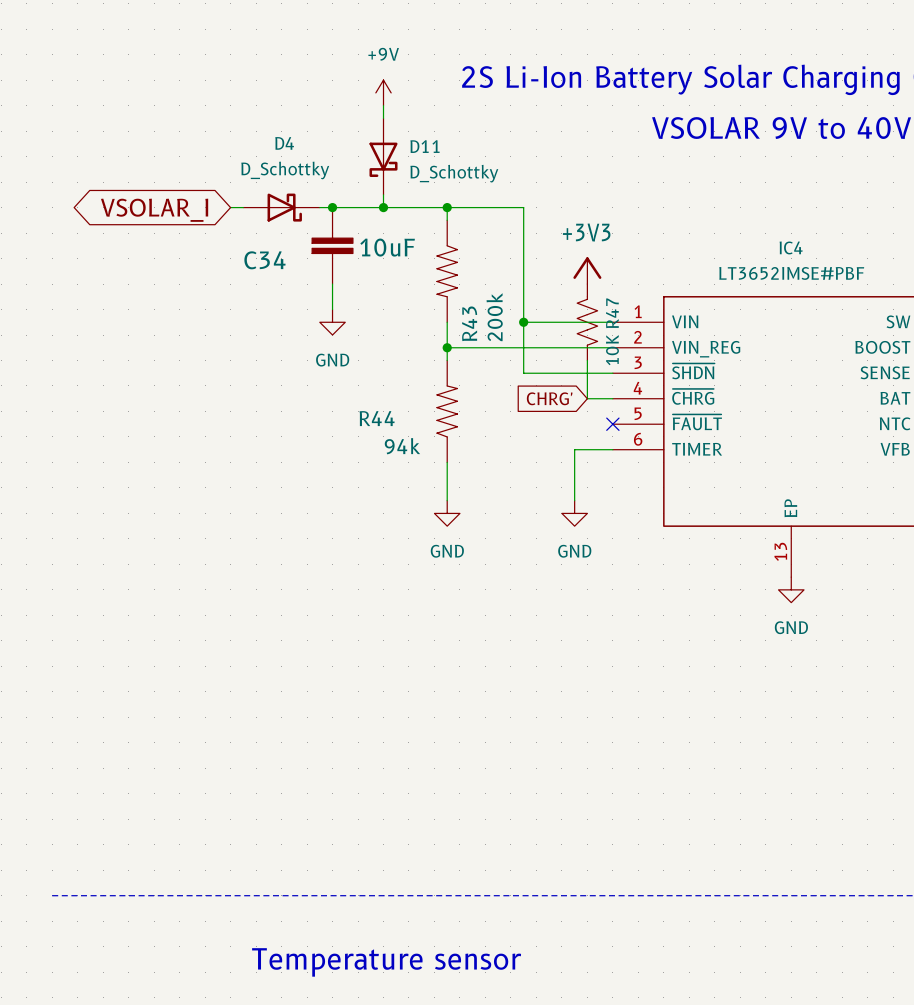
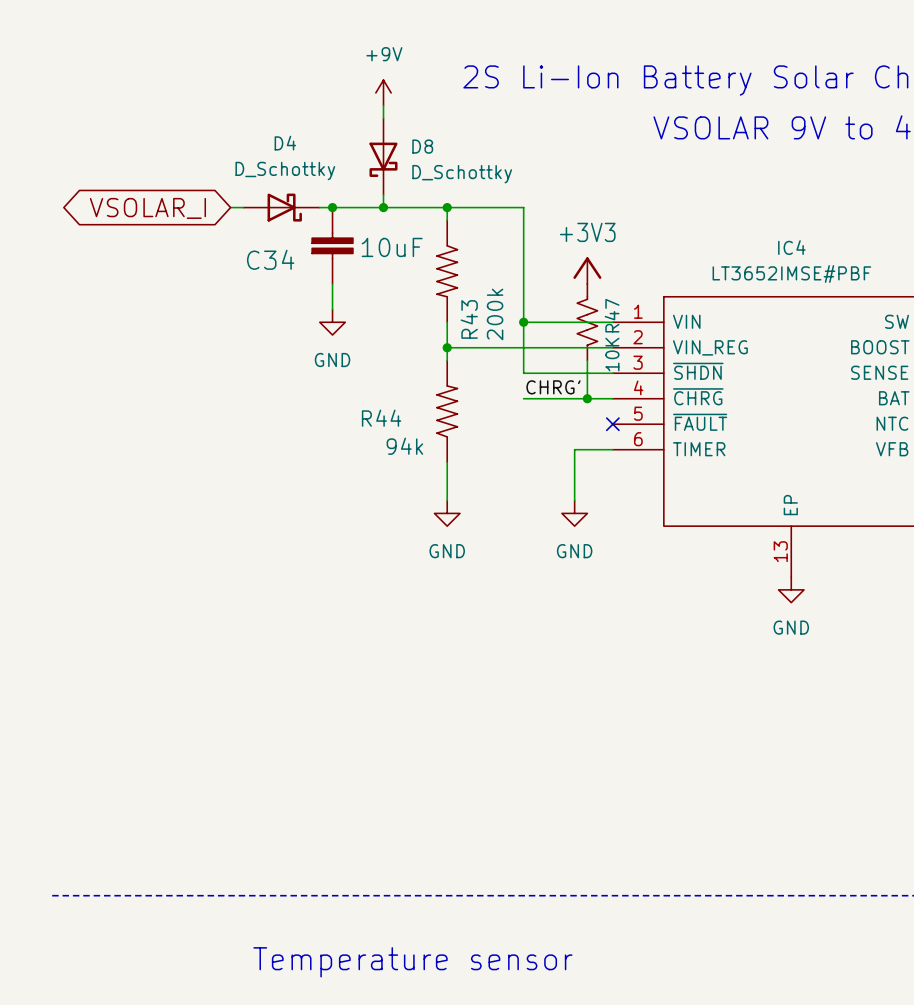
D11 name: D11 (425, 146) -> D8 (422, 146)
label: none -> CHRG' (553, 387)
wire: none -> (523, 398) (587, 398)
global label: CHRG' (549, 398) -> none
junction: none -> (587, 398)

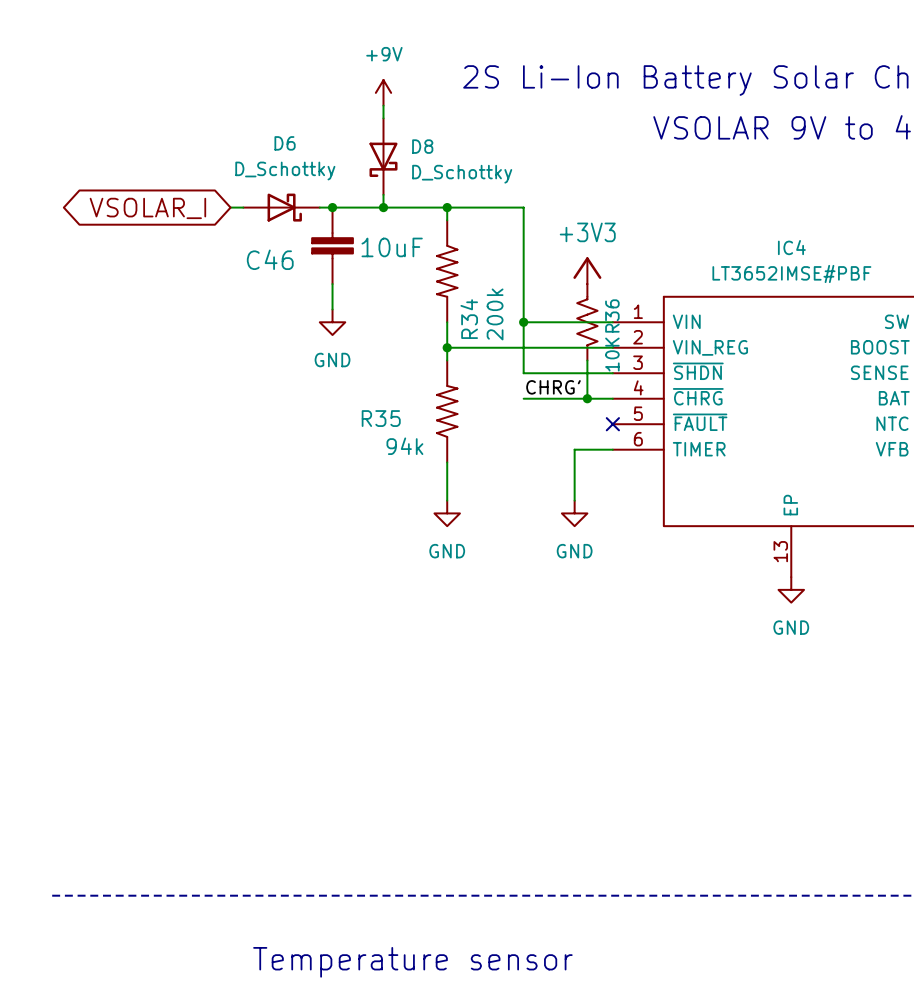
D4 name: D4 (285, 143) -> D6 (285, 143)
C34 name: C34 (270, 259) -> C46 (270, 259)
R47 name: R47 (612, 315) -> R36 (612, 315)
R43 name: R43 (469, 319) -> R34 (469, 319)
R44 name: R44 (381, 418) -> R35 (381, 418)

